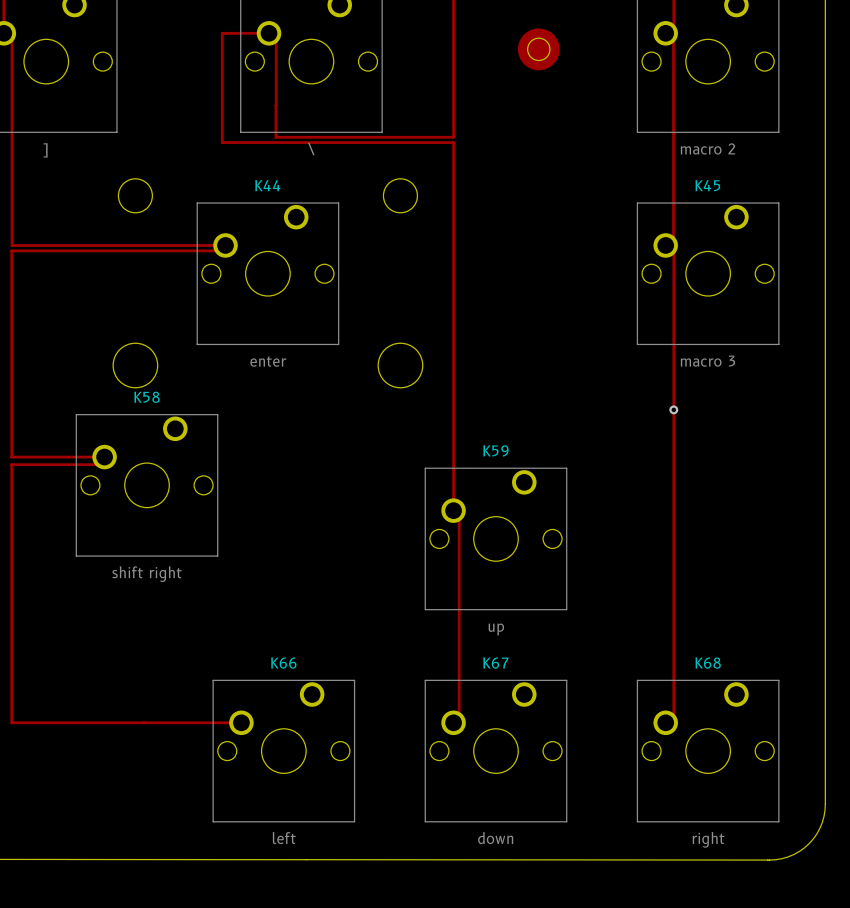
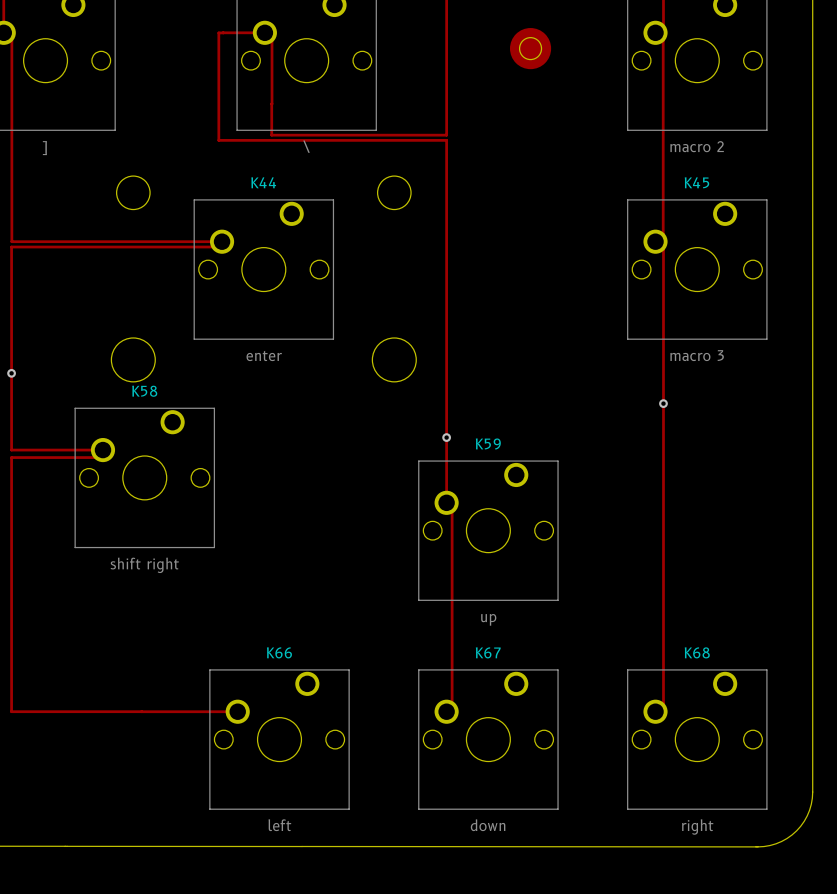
via: none -> (11, 373)
via: none -> (446, 437)

